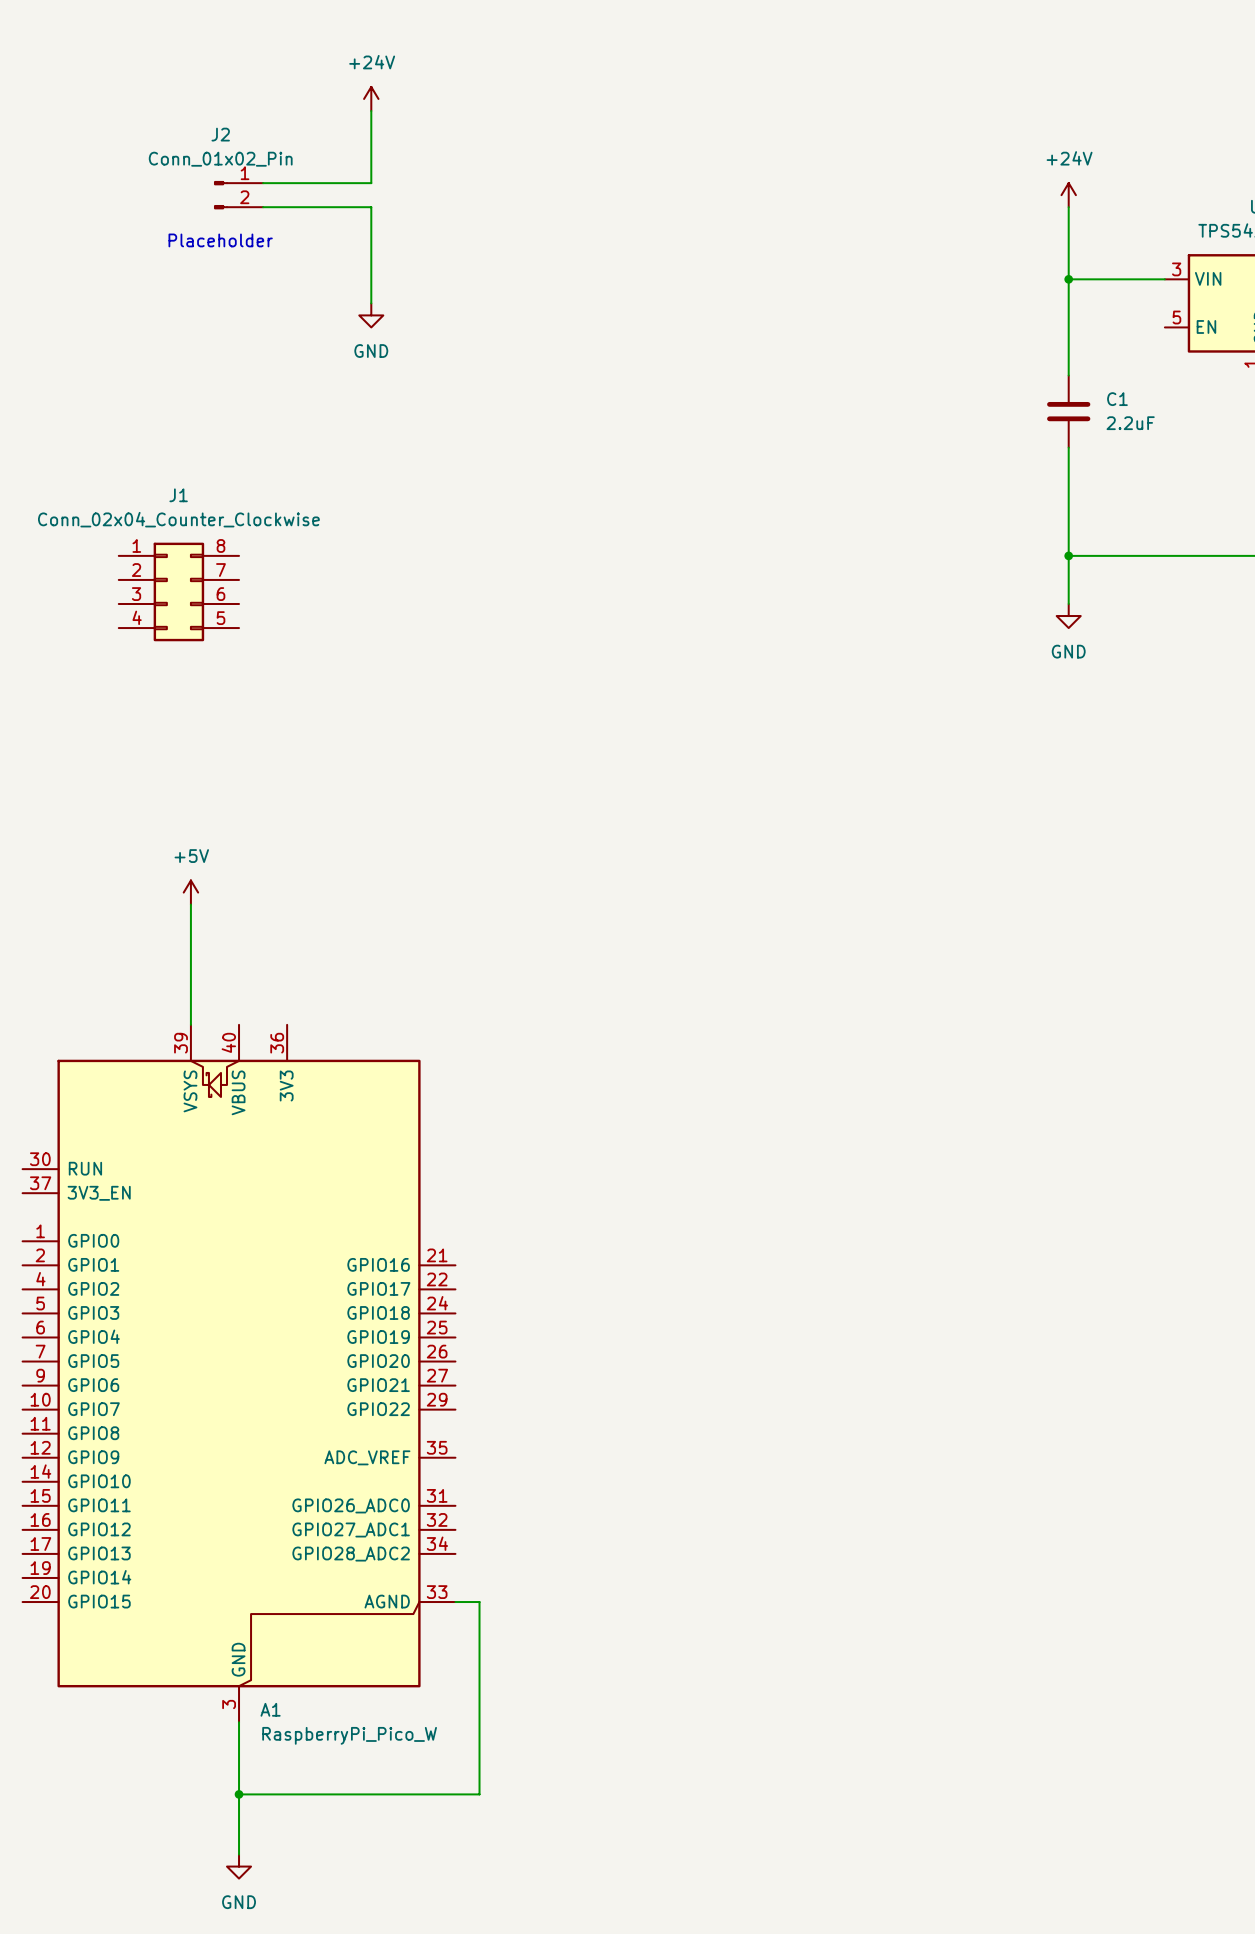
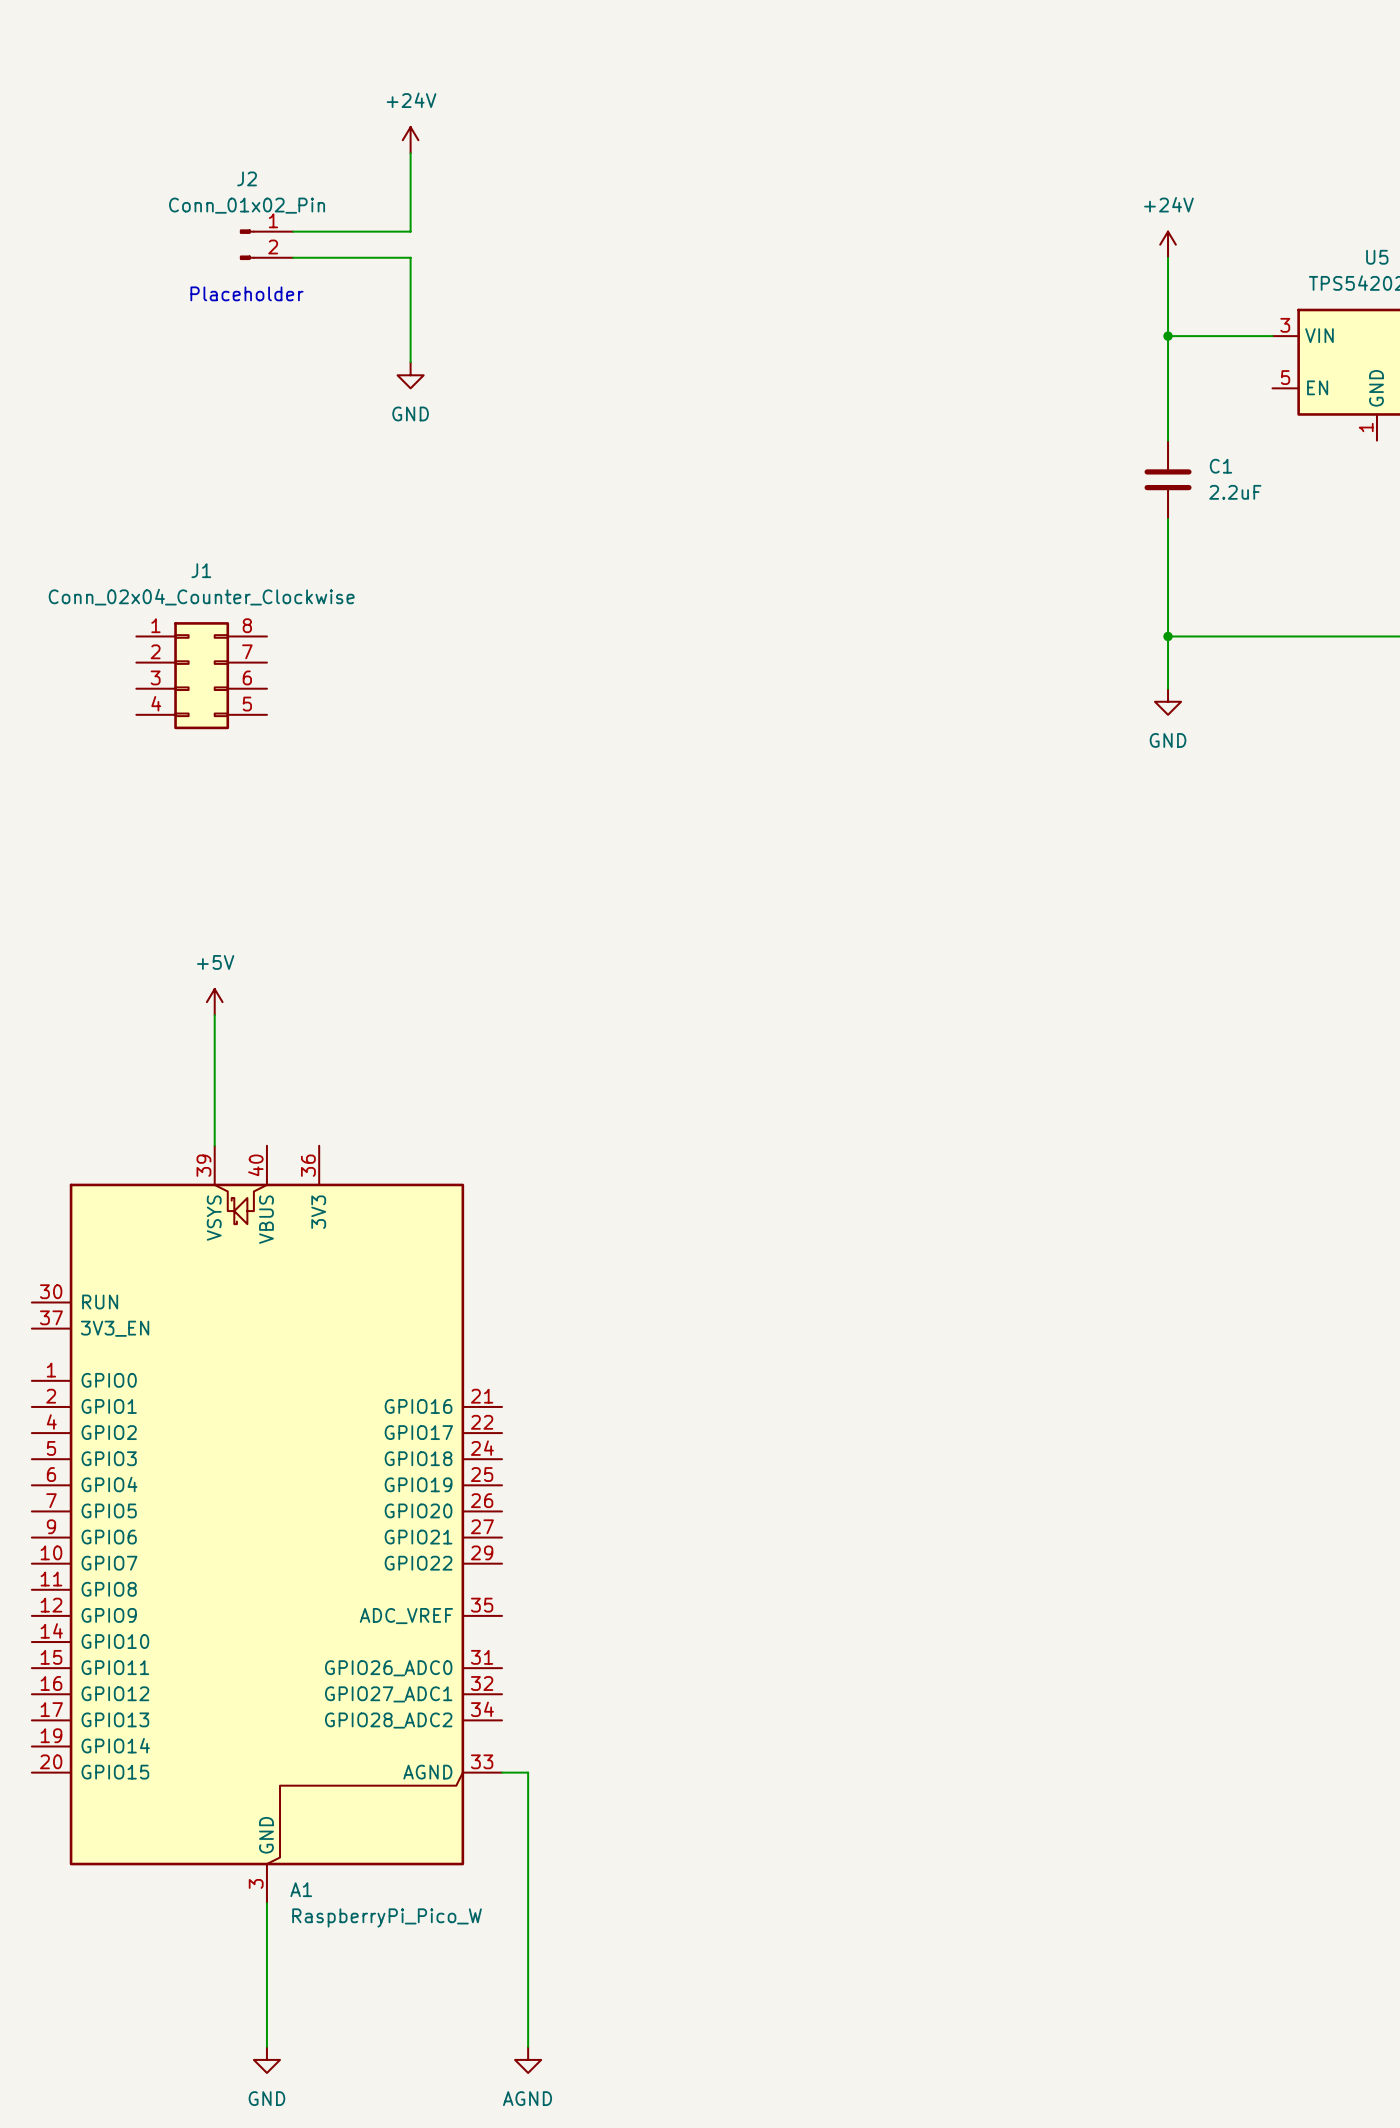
wire: (239, 1794) (479, 1794) -> (528, 2046) (528, 1981)
junction: (239, 1794) -> none
power symbol: none -> AGND (528, 2059)

